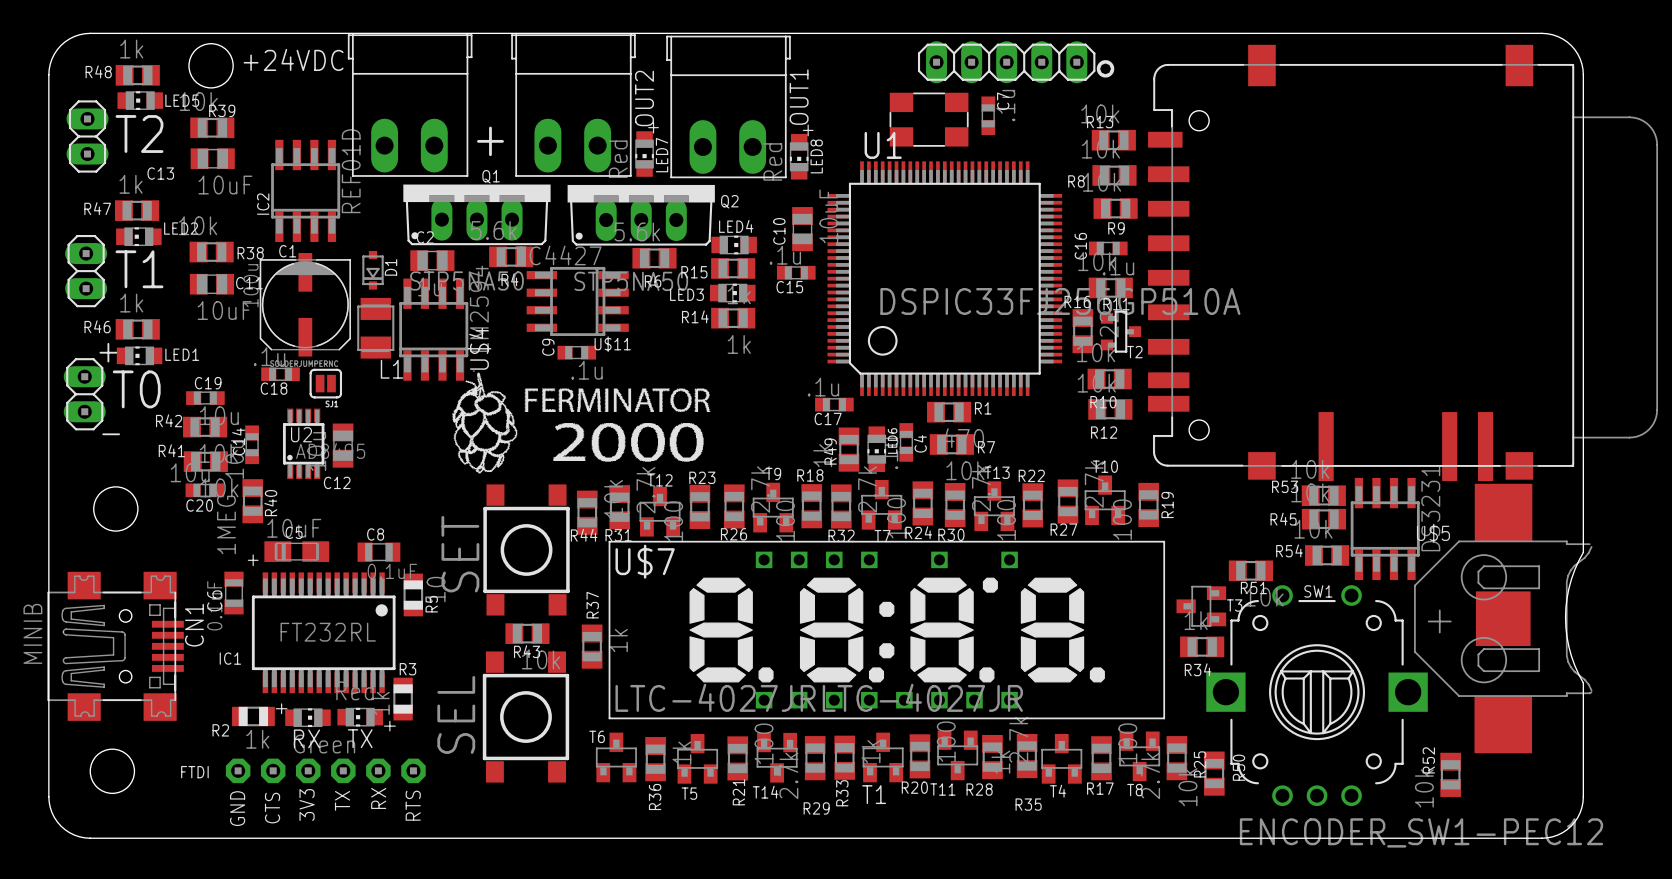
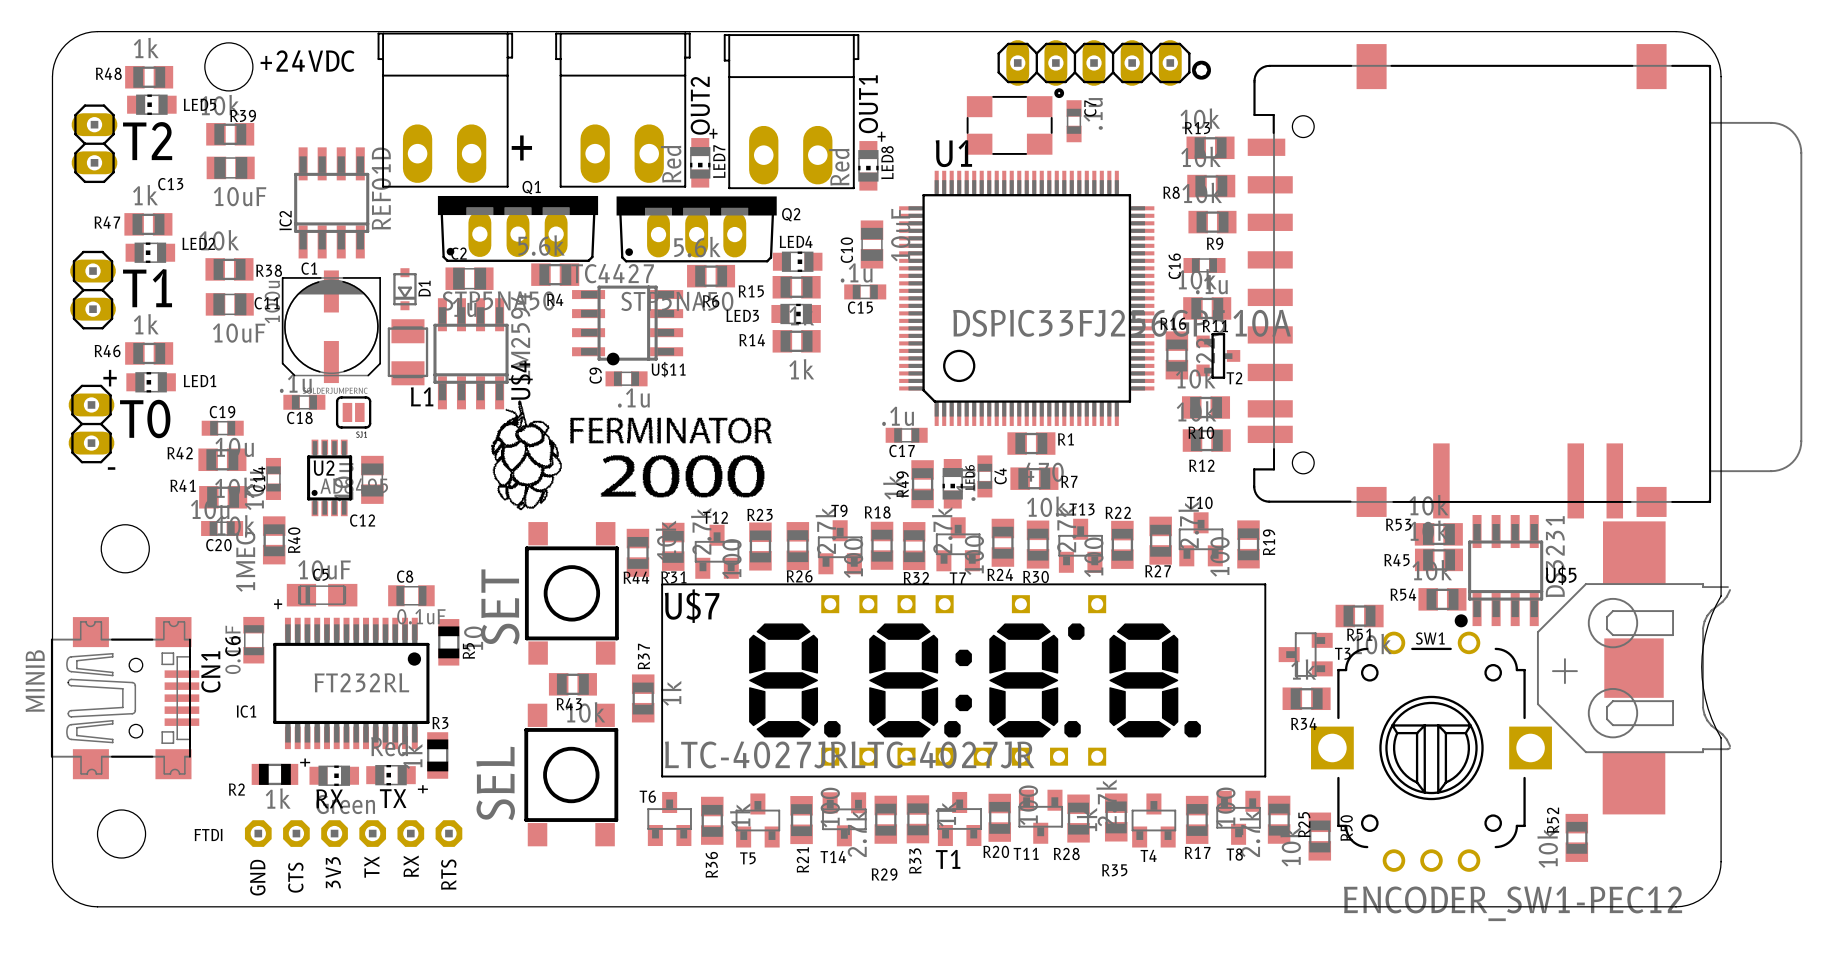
drawing: none -> [1054, 88, 1065, 99]
drawing: none -> [606, 352, 620, 366]
drawing: none -> [1454, 614, 1468, 628]

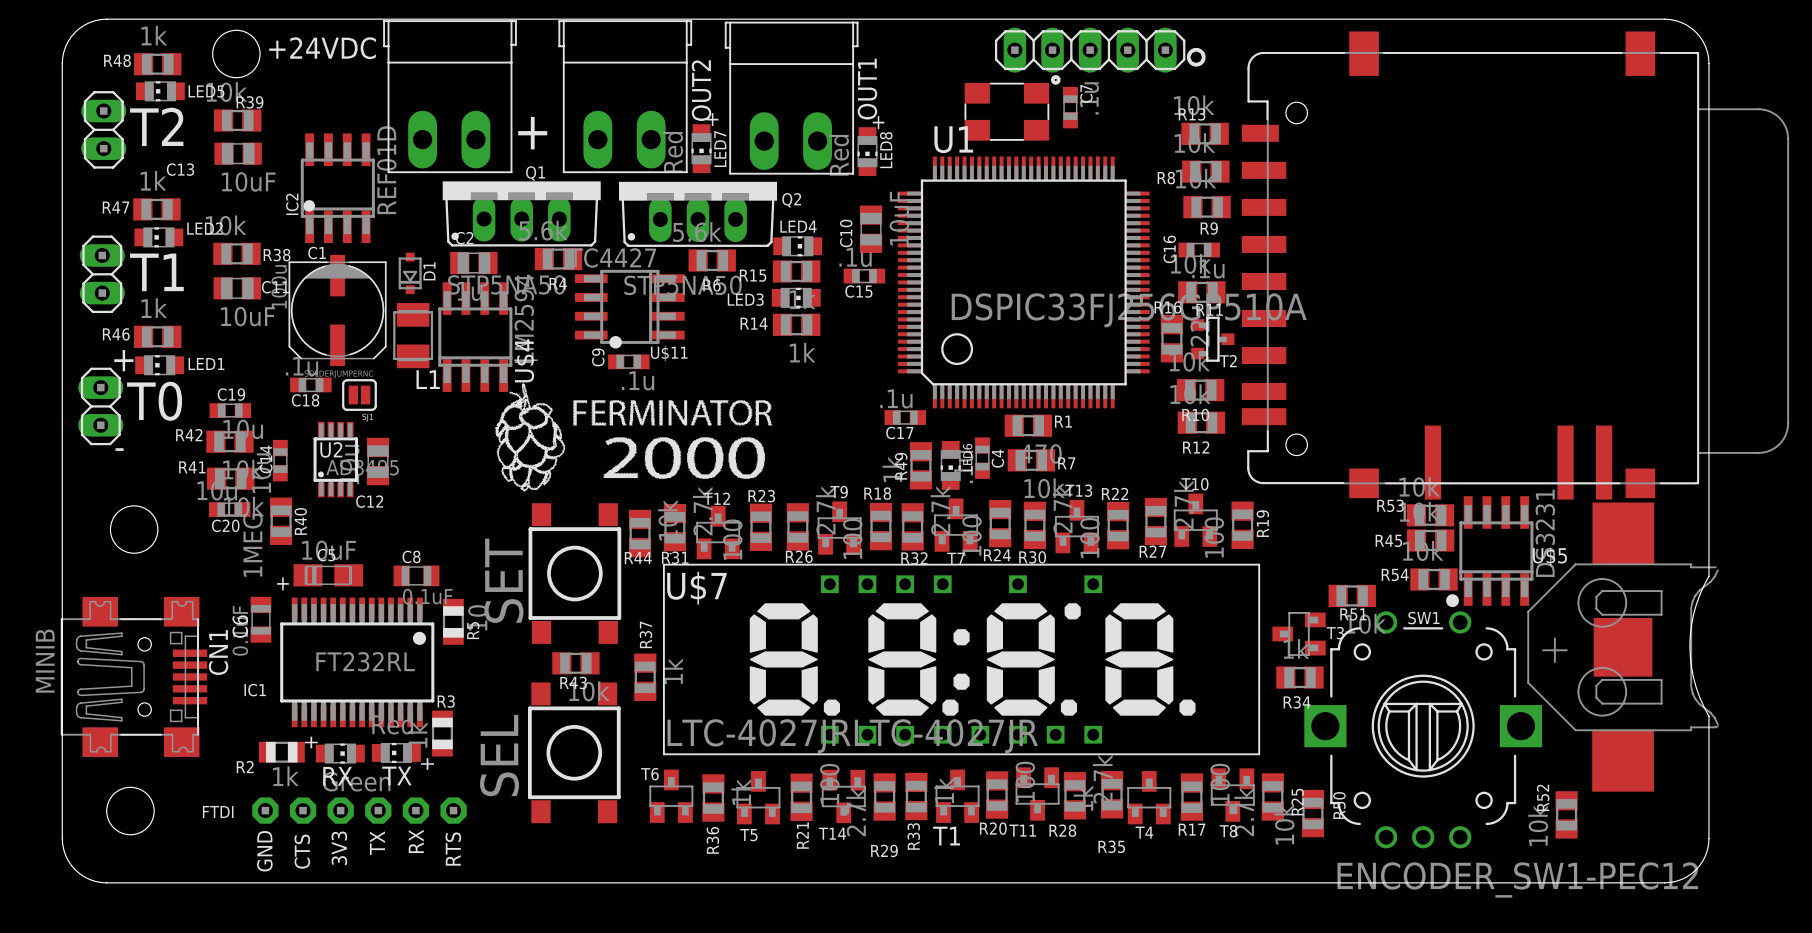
drawing: none -> [303, 200, 316, 212]

